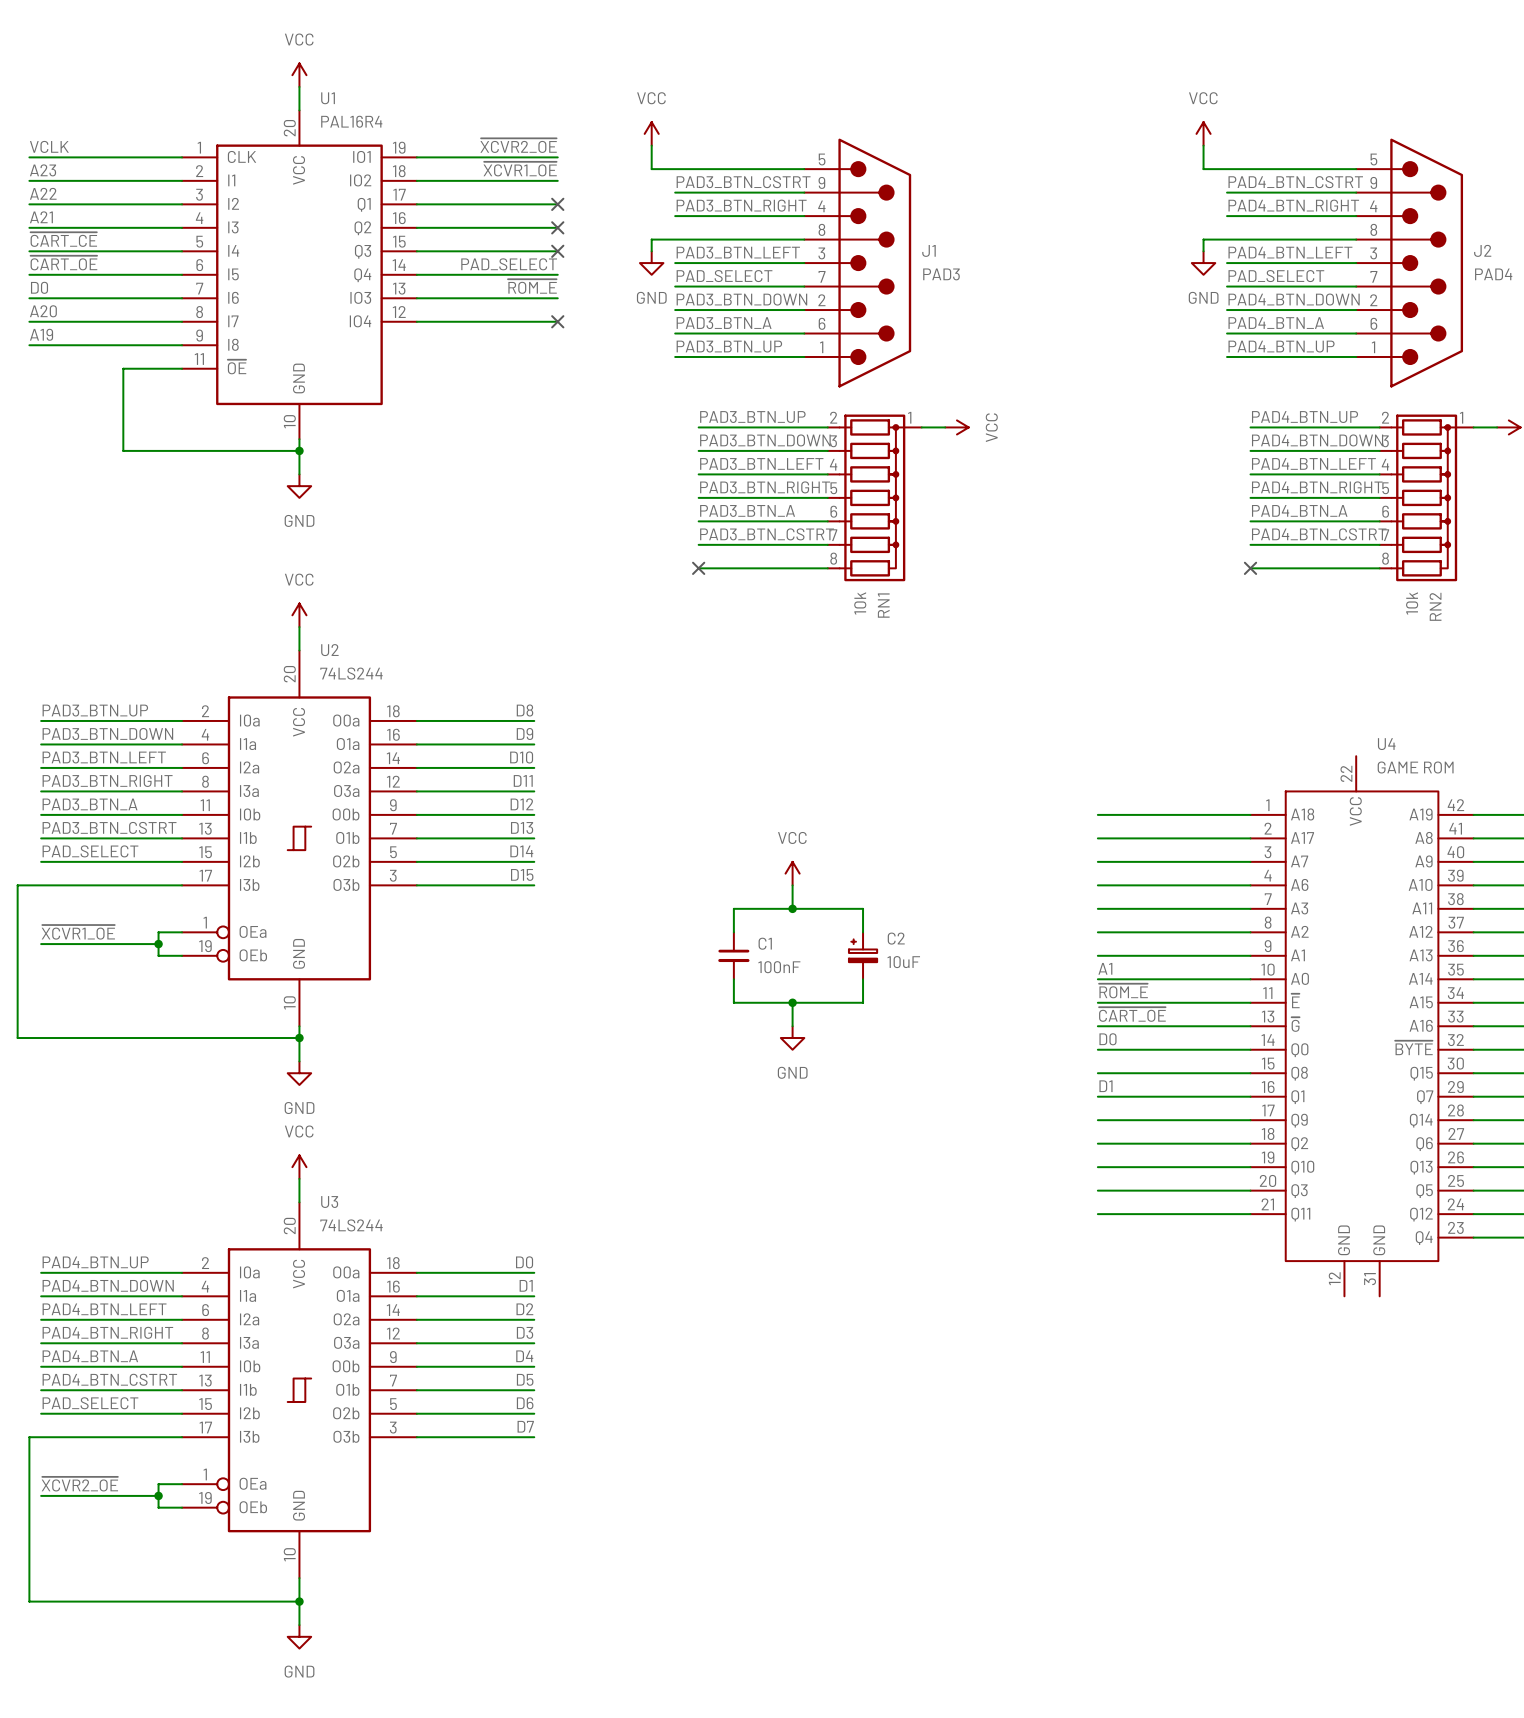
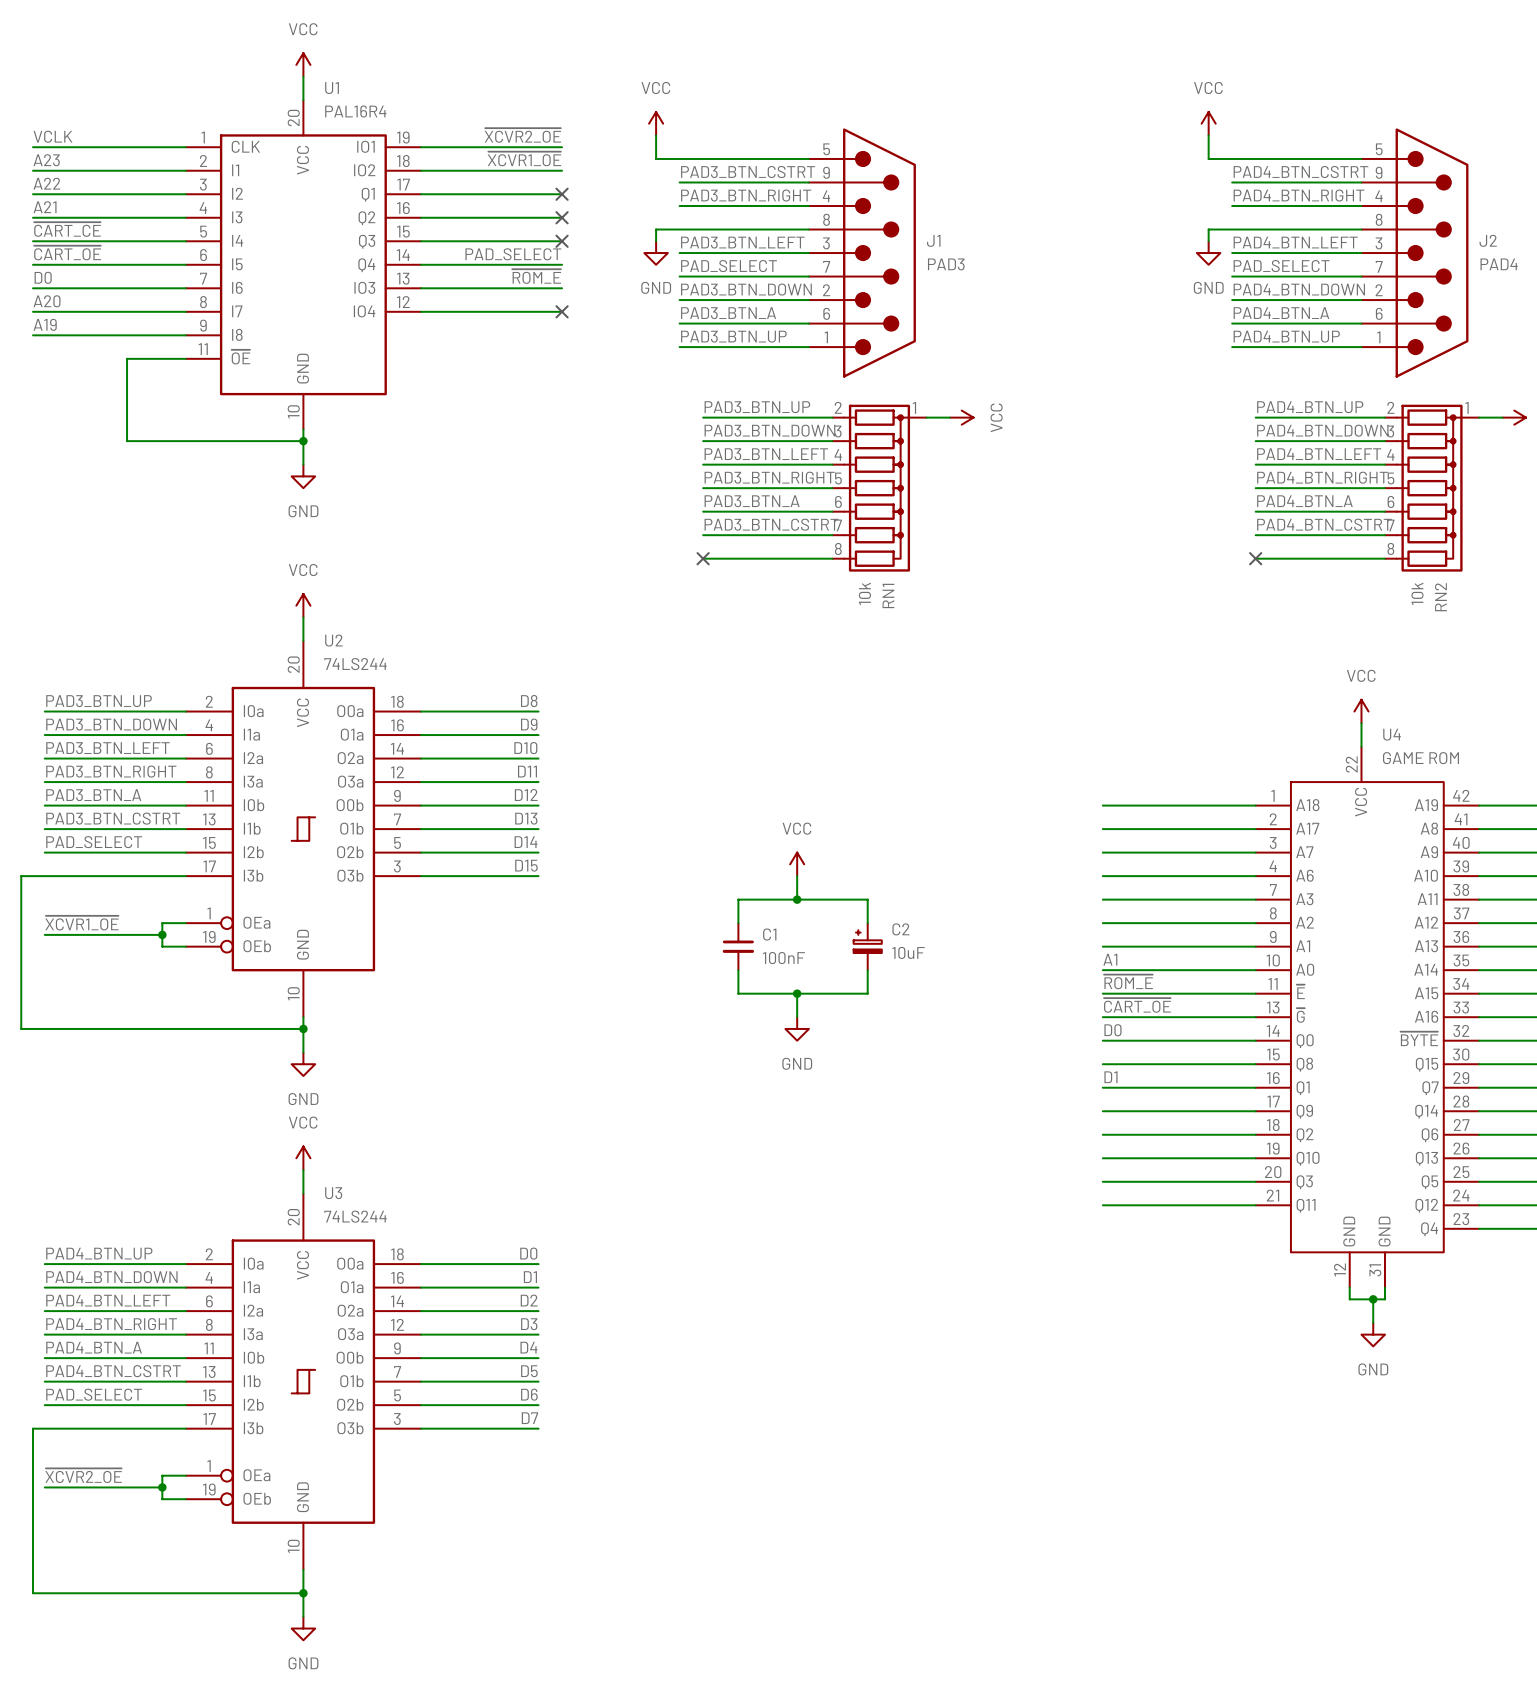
power symbol: none -> VCC (1361, 711)
wire: none -> (1361, 723) (1361, 746)
wire: none -> (1349, 1287) (1349, 1299) (1384, 1299) (1384, 1287)
wire: none -> (1373, 1299) (1373, 1322)
junction: none -> (1373, 1299)
power symbol: none -> GND (1373, 1334)

